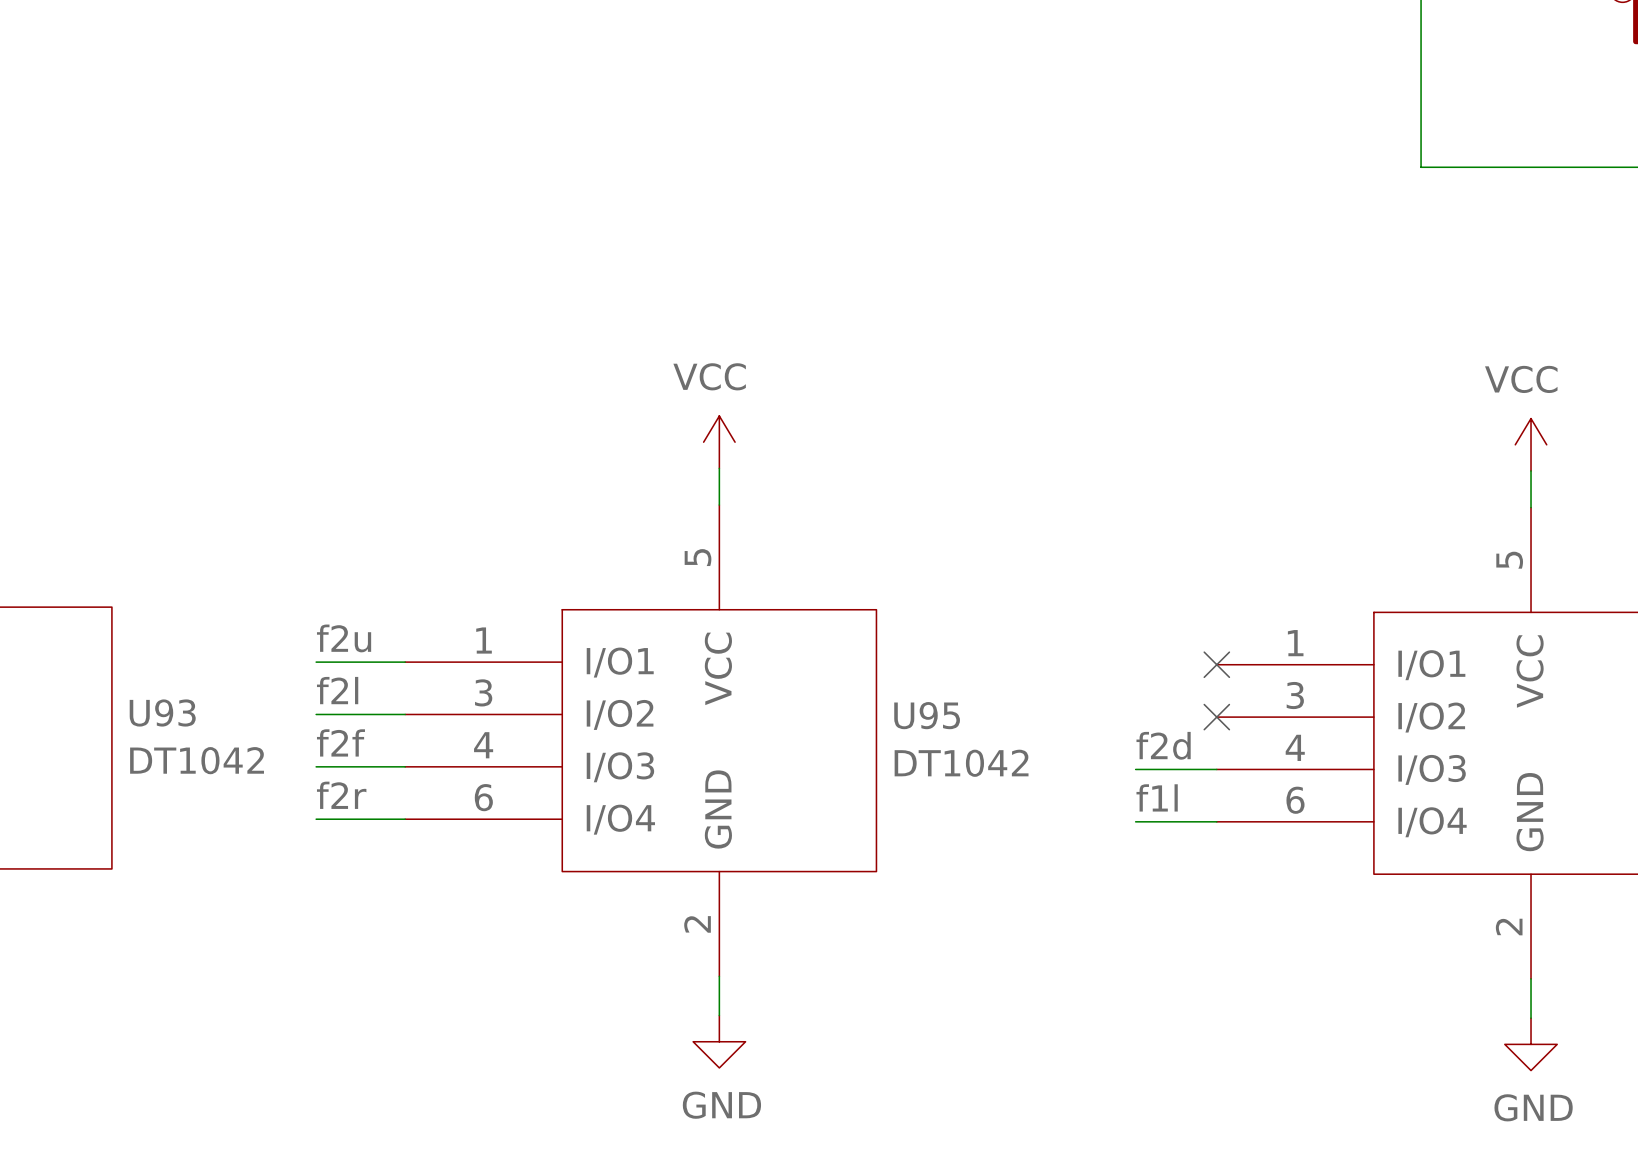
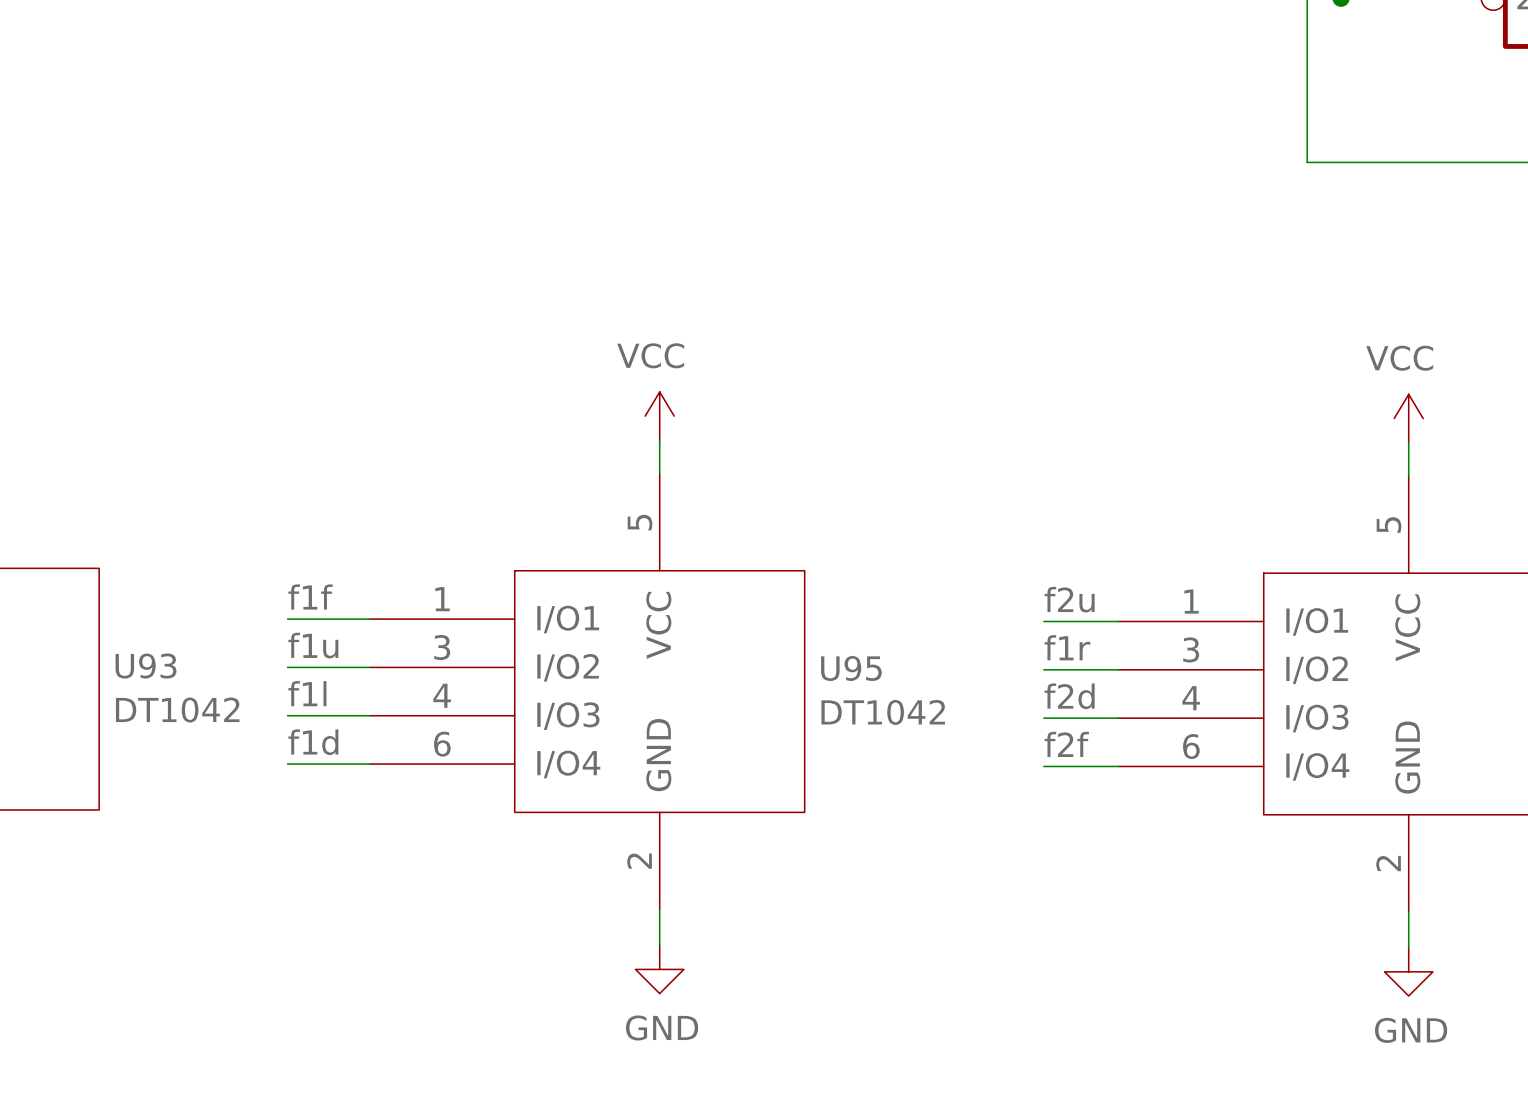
label: f2u (344, 638) -> f1f (310, 597)
label: none -> f2u (1069, 599)
wire: none -> (1043, 621) (1118, 621)
no-connect mark: (1216, 664) -> none
label: f2l (337, 690) -> f1u (313, 645)
label: none -> f1r (1067, 647)
wire: none -> (1043, 669) (1118, 669)
no-connect mark: (1216, 717) -> none
label: f2f (340, 742) -> f1l (307, 693)
label: f2r (341, 795) -> f1d (313, 742)
label: f1l (1157, 797) -> f2f (1066, 744)

